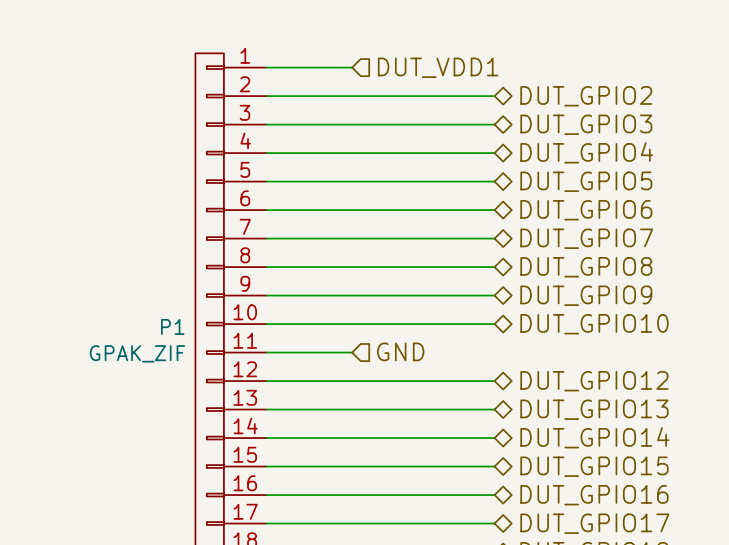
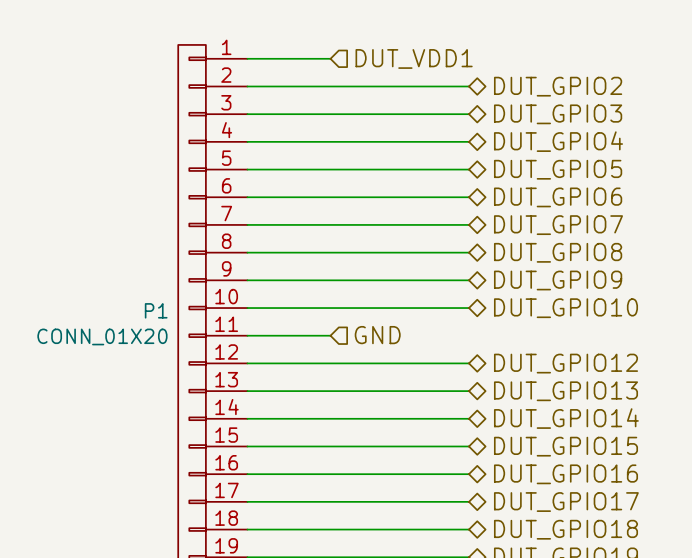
P1 value: GPAK_ZIF (137, 353) -> CONN_01X20 (102, 336)

